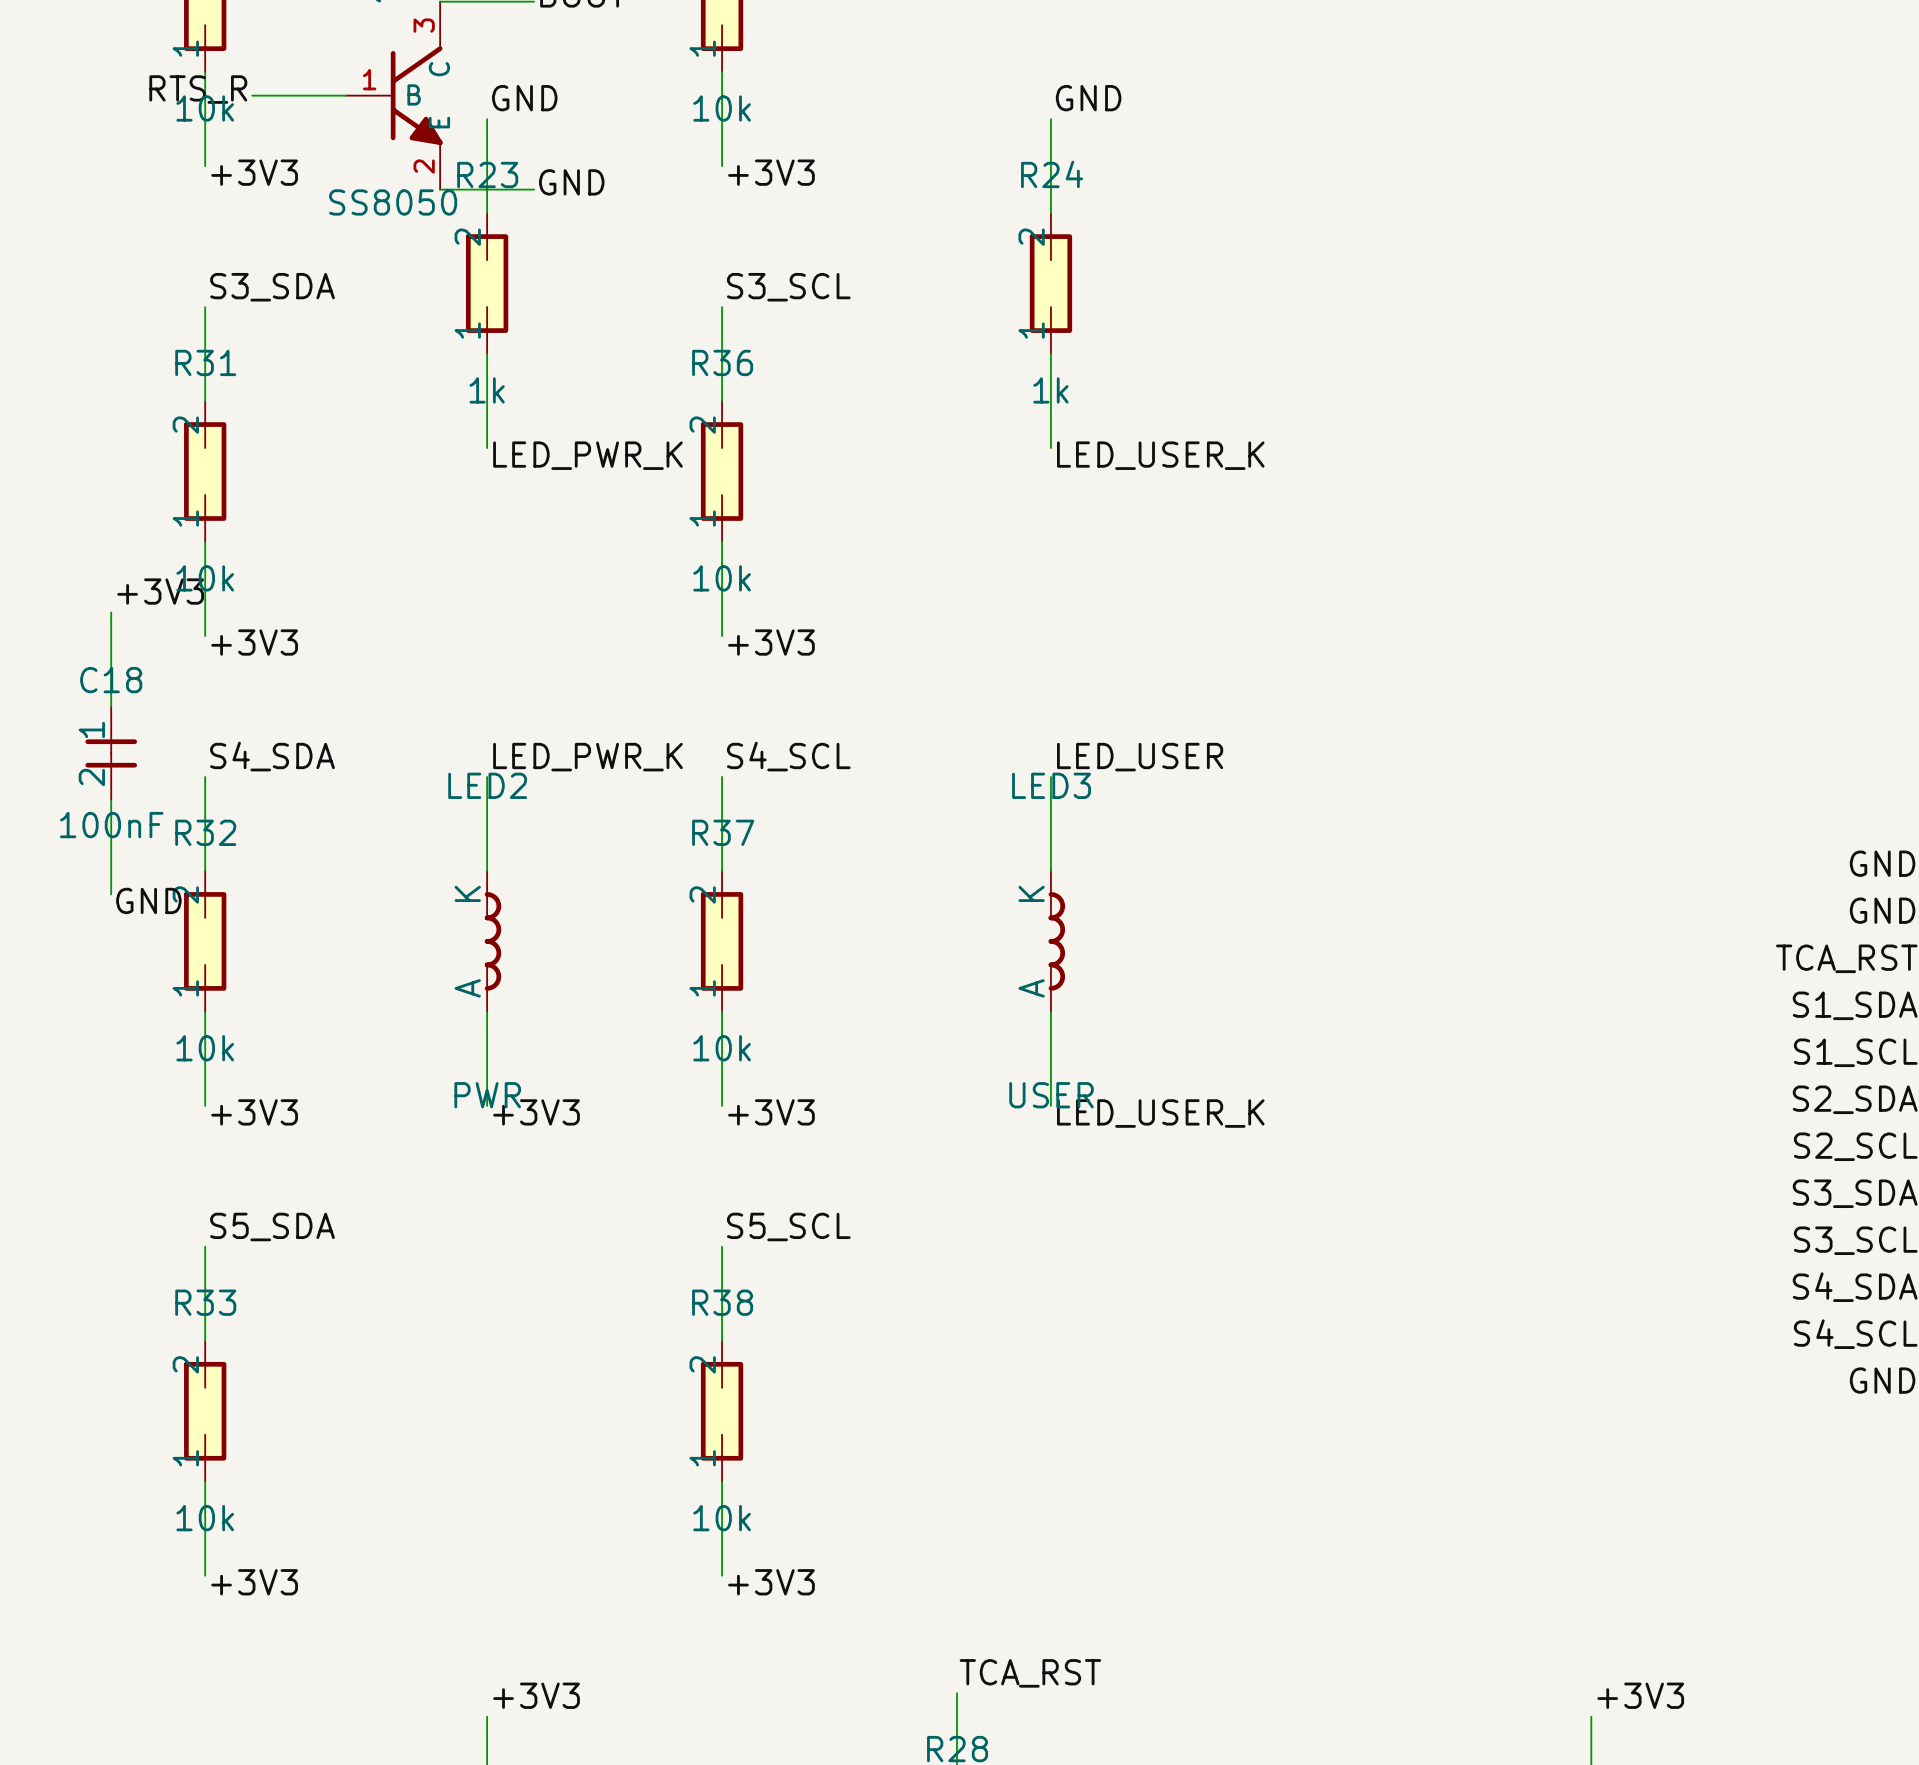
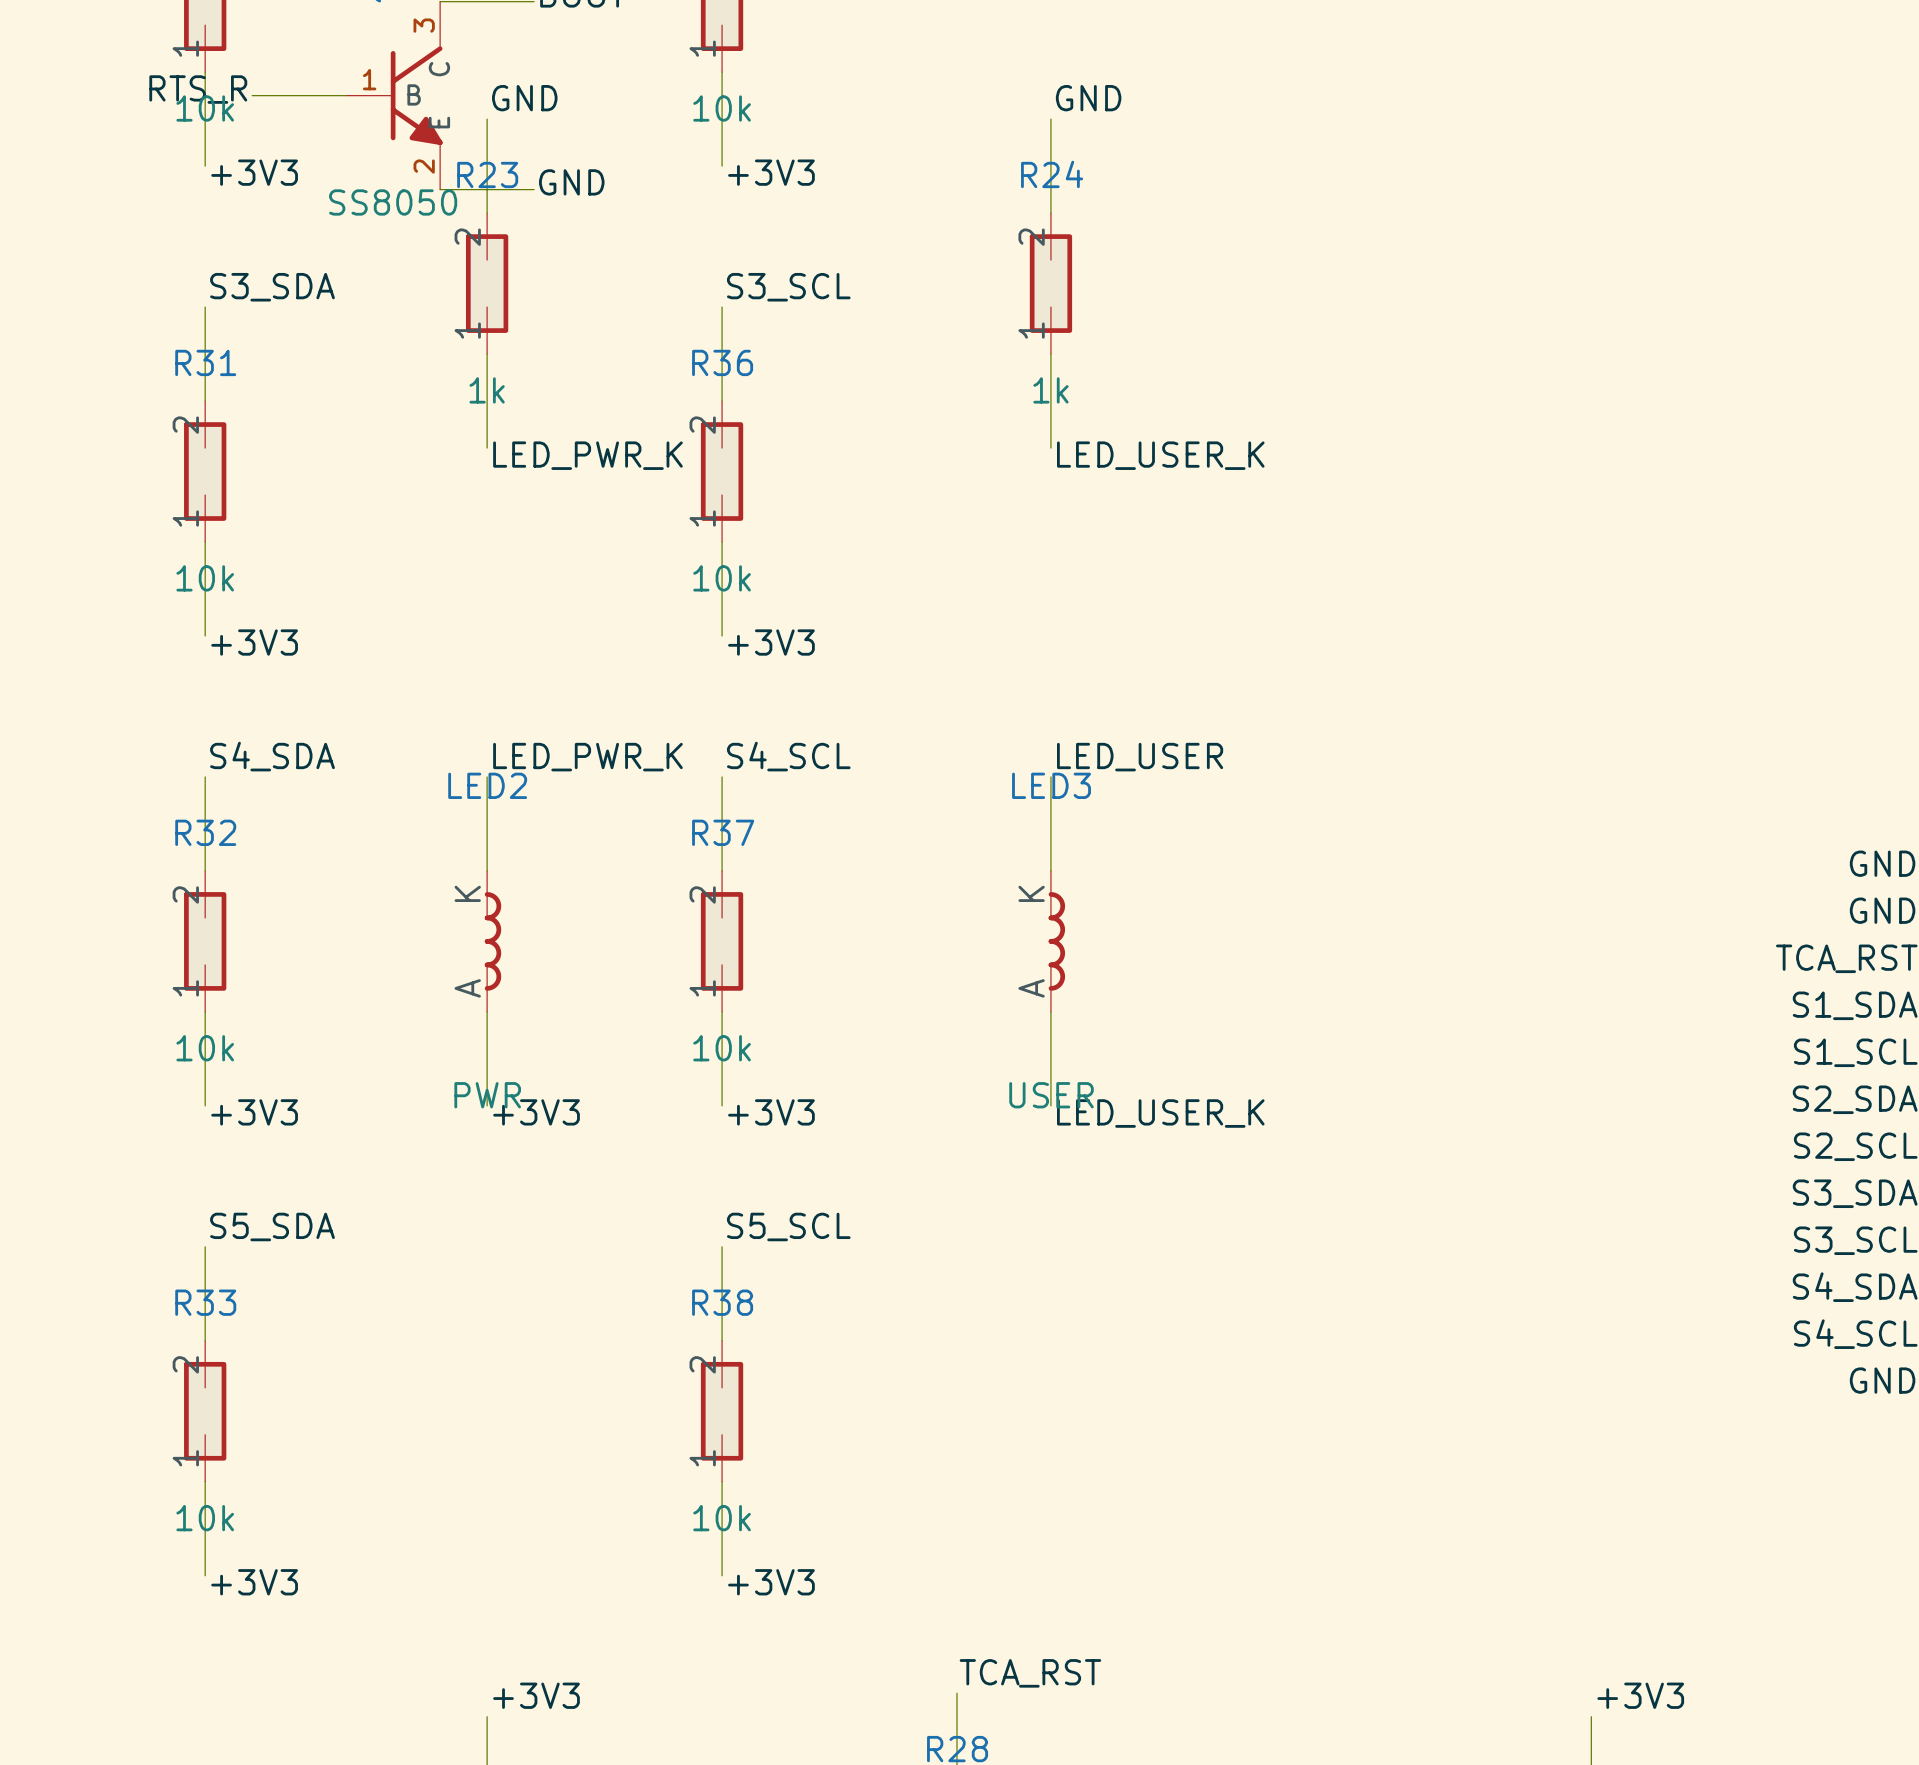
label: +3V3 (160, 591) -> none
wire: (111, 612) (111, 706) -> none
C18: 100nF (111, 753) -> none
wire: (111, 800) (111, 894) -> none
label: GND (148, 900) -> none

